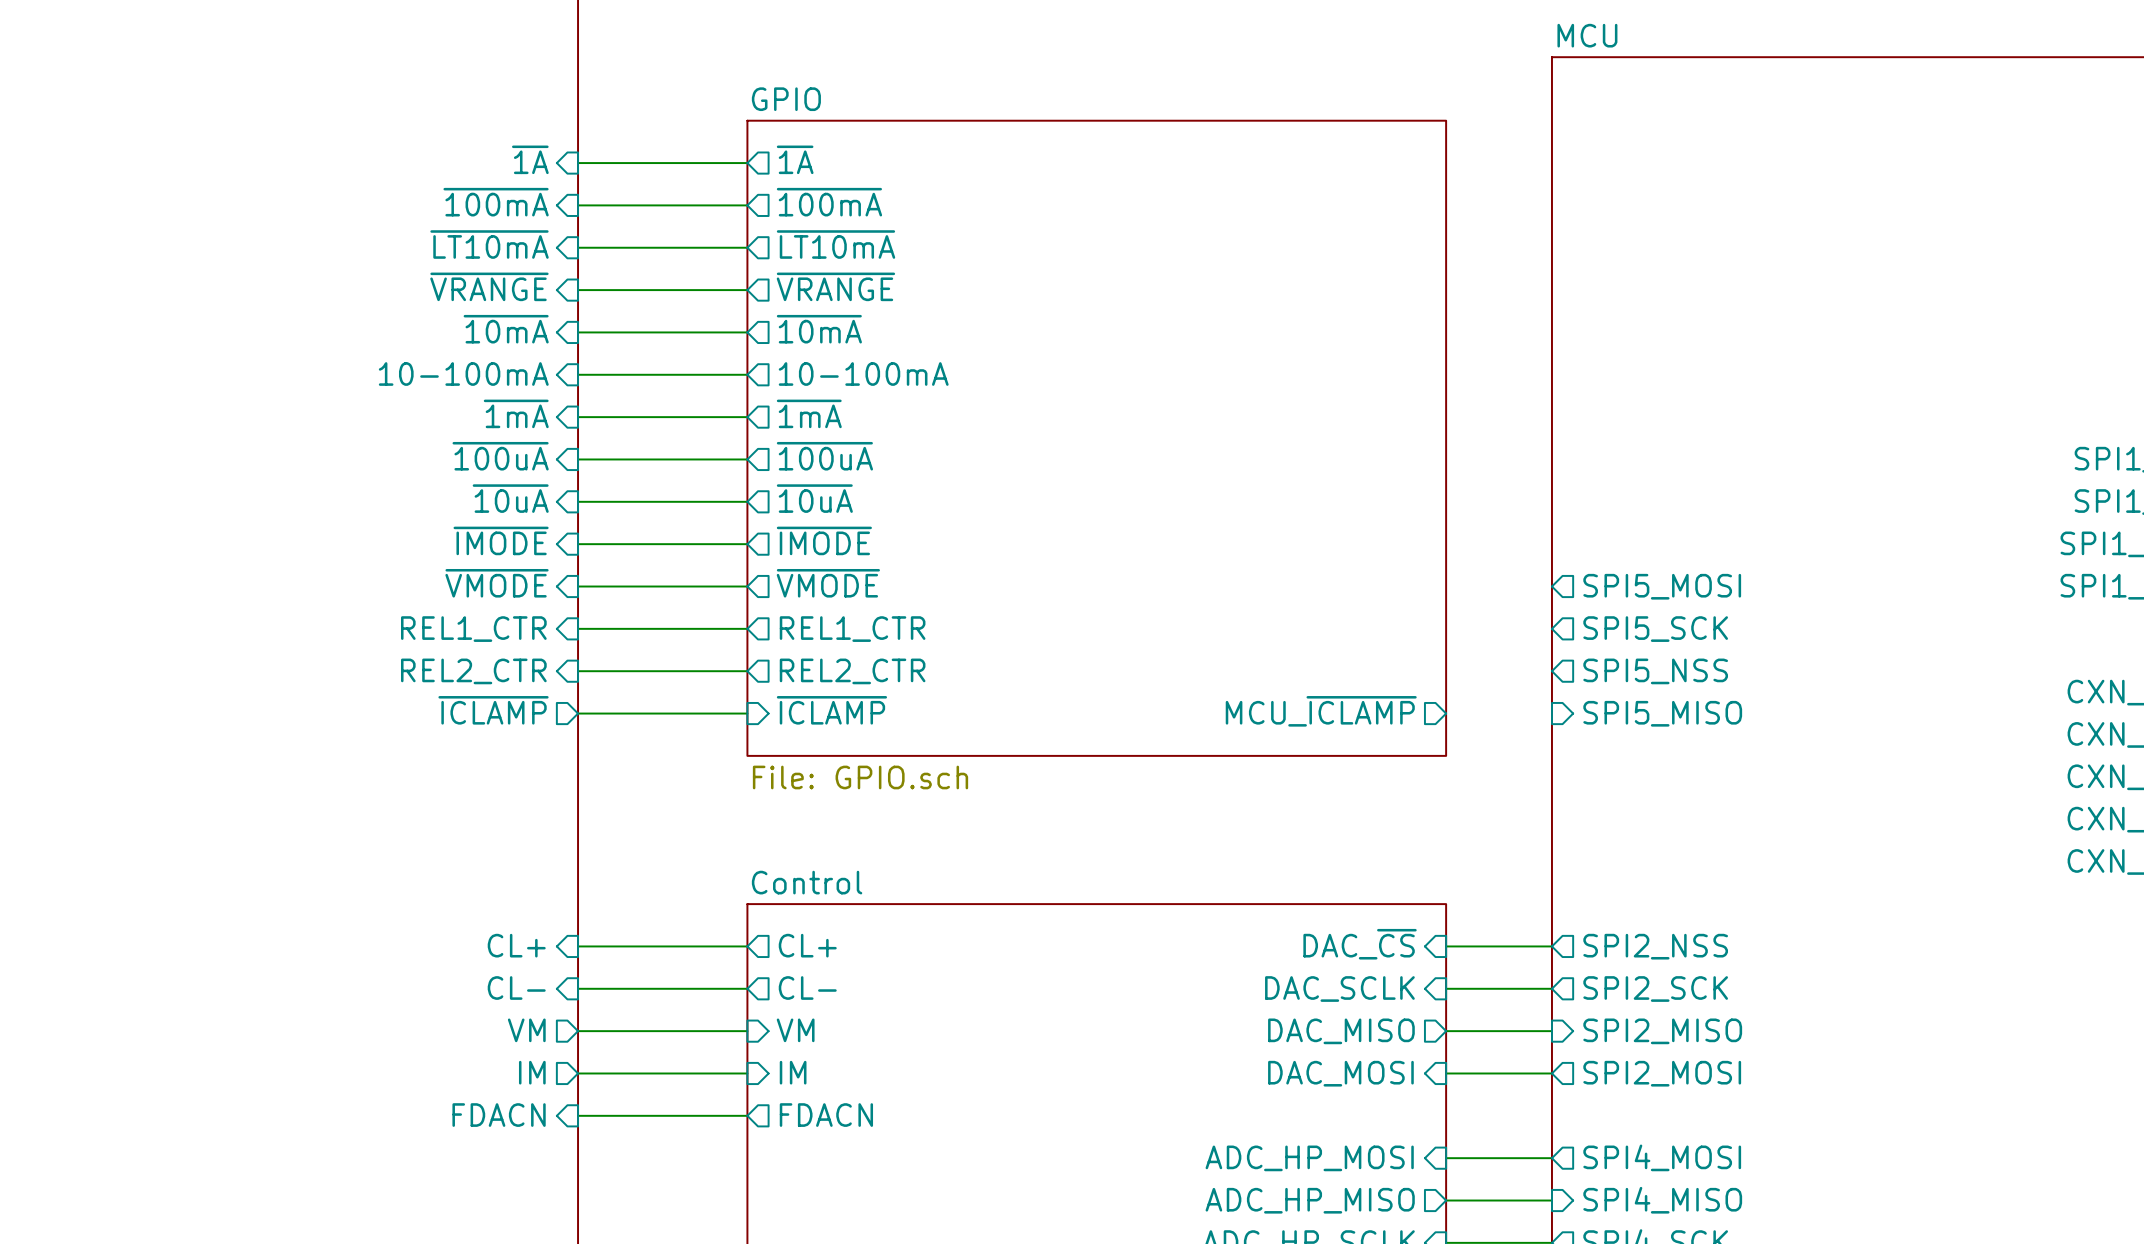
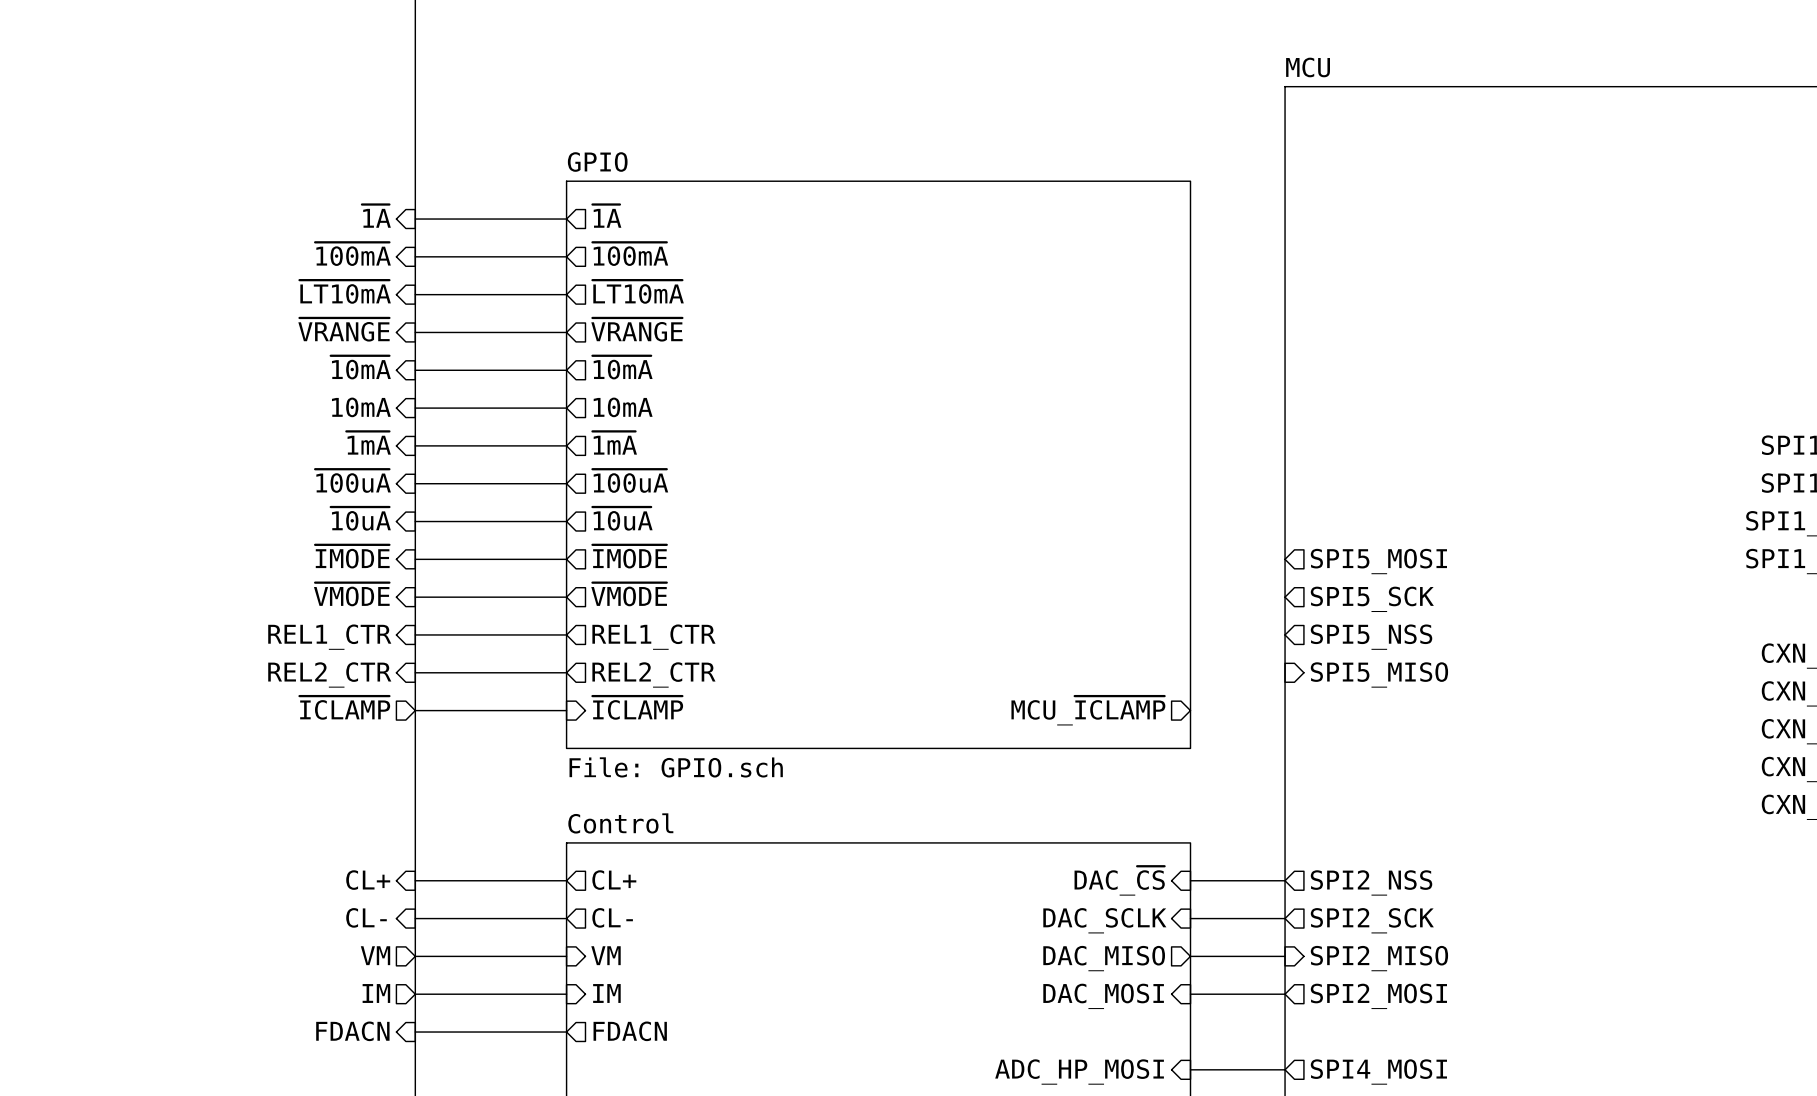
sheet pin: ~{1A} (530, 159) -> none
sheet pin: ~{1A} (795, 159) -> none
wire: (578, 163) (747, 163) -> none
sheet pin: ~{100mA} (496, 202) -> ~{1A} (376, 216)
sheet pin: ~{100mA} (829, 202) -> ~{1A} (606, 216)
sheet pin: ~{LT10mA} (489, 244) -> ~{100mA} (352, 254)
sheet pin: ~{LT10mA} (836, 244) -> ~{100mA} (630, 254)
sheet pin: ~{VRANGE} (489, 286) -> ~{LT10mA} (345, 291)
sheet pin: ~{VRANGE} (835, 286) -> ~{LT10mA} (638, 291)
sheet pin: ~{10mA} (506, 329) -> ~{VRANGE} (344, 329)
sheet pin: ~{10mA} (819, 329) -> ~{VRANGE} (636, 329)
sheet pin: 10-100mA (463, 373) -> ~{10mA} (360, 367)
sheet pin: 10-100mA (863, 373) -> ~{10mA} (622, 367)
sheet pin: ~{1mA} (516, 413) -> 10mA (361, 407)
sheet pin: ~{1mA} (809, 413) -> 10mA (623, 407)
sheet GPIO position: (1096, 438) -> (878, 464)
sheet pin: ~{100uA} (500, 456) -> ~{1mA} (368, 443)
sheet pin: ~{100uA} (824, 456) -> ~{1mA} (614, 443)
sheet pin: ~{10uA} (510, 498) -> ~{100uA} (352, 481)
sheet pin: ~{10uA} (814, 498) -> ~{100uA} (630, 481)
sheet pin: ~{IMODE} (501, 540) -> ~{10uA} (360, 518)
sheet pin: ~{IMODE} (824, 540) -> ~{10uA} (622, 518)
sheet pin: ~{VMODE} (496, 583) -> ~{IMODE} (352, 556)
sheet pin: ~{VMODE} (828, 583) -> ~{IMODE} (629, 556)
sheet pin: REL1_CTR (473, 629) -> ~{VMODE} (351, 594)
sheet pin: REL1_CTR (852, 629) -> ~{VMODE} (629, 594)
sheet pin: REL2_CTR (473, 671) -> REL1_CTR (329, 637)
sheet pin: REL2_CTR (852, 671) -> REL1_CTR (653, 637)
sheet pin shape: output (493, 710) -> input (329, 674)
sheet pin: ~{ICLAMP} (493, 710) -> REL2_CTR (329, 674)
sheet pin shape: input (831, 710) -> output (653, 674)
sheet pin: ~{ICLAMP} (831, 710) -> REL2_CTR (653, 674)
sheet pin position: MCU_~{ICLAMP} (1321, 711) -> MCU_~{ICLAMP} (1088, 710)
sheet pin: none -> ~{ICLAMP} (344, 707)
sheet pin: none -> ~{ICLAMP} (637, 707)
wire: none -> (415, 710) (566, 710)

